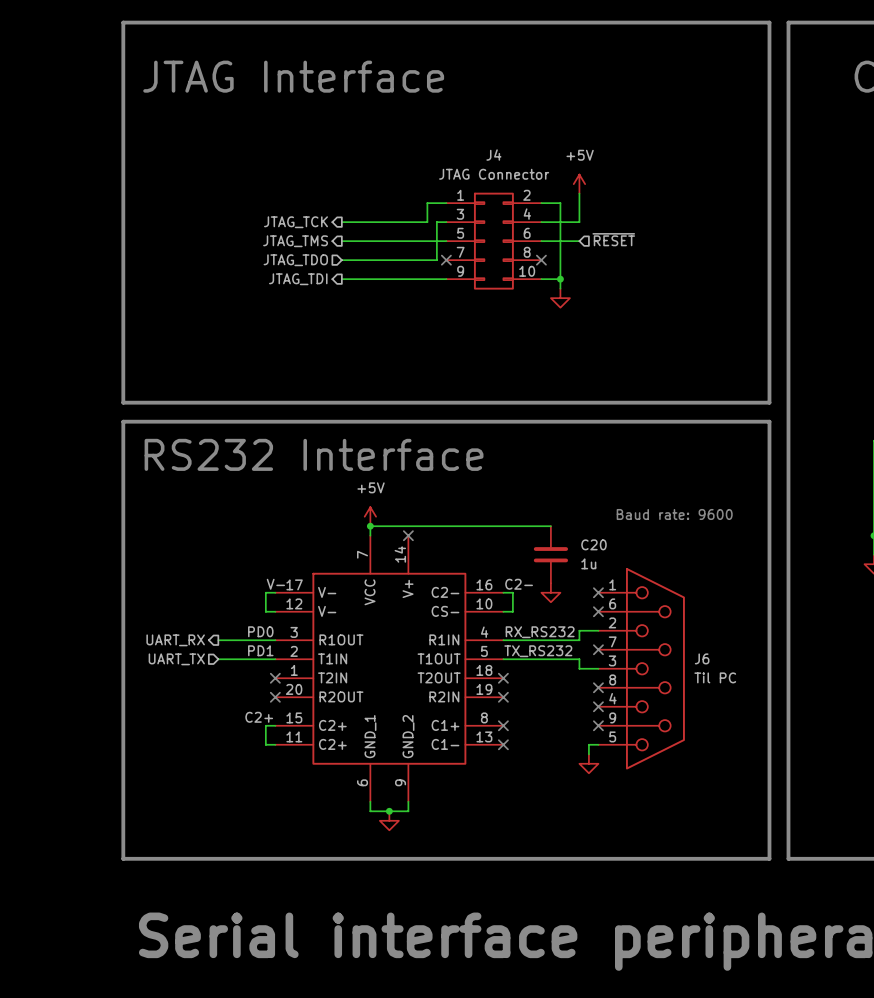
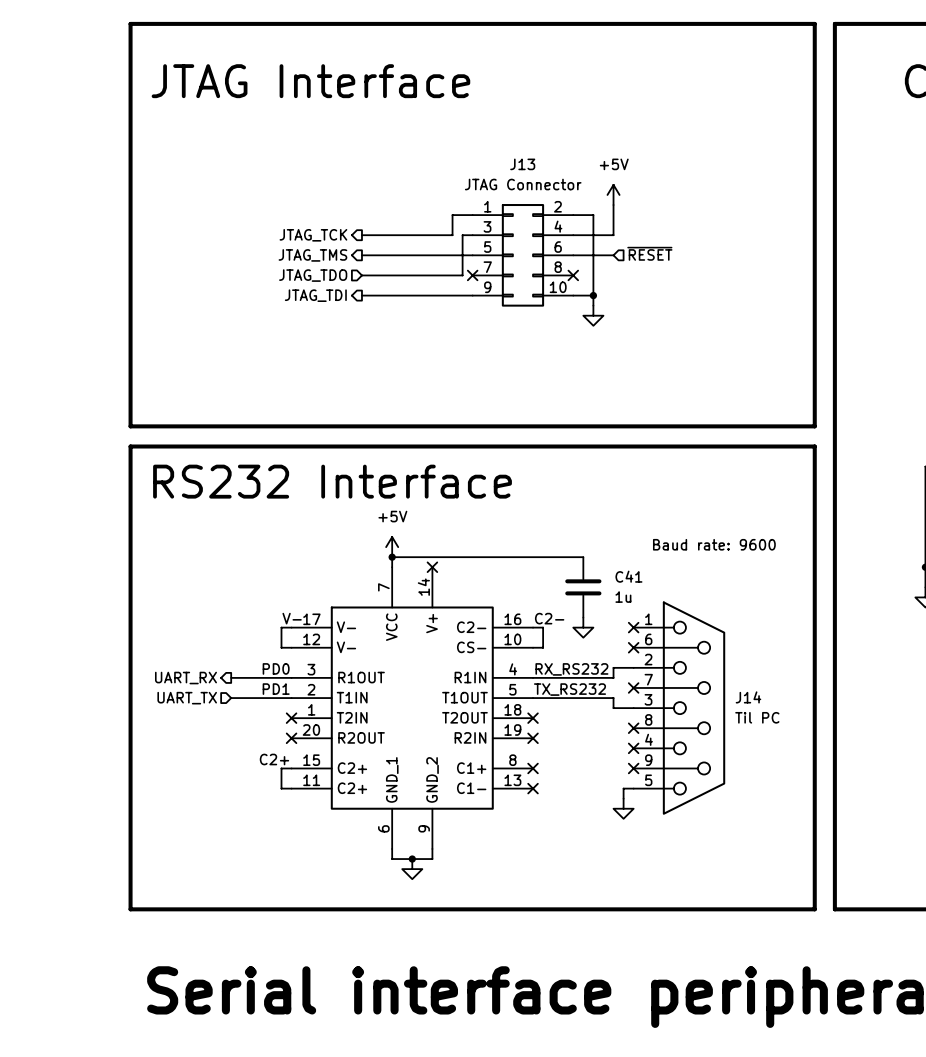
J4 name: J4 (493, 155) -> J13 (522, 164)
C20 name: C20 (593, 544) -> C41 (628, 576)
J6 name: J6 (702, 658) -> J14 (748, 697)

